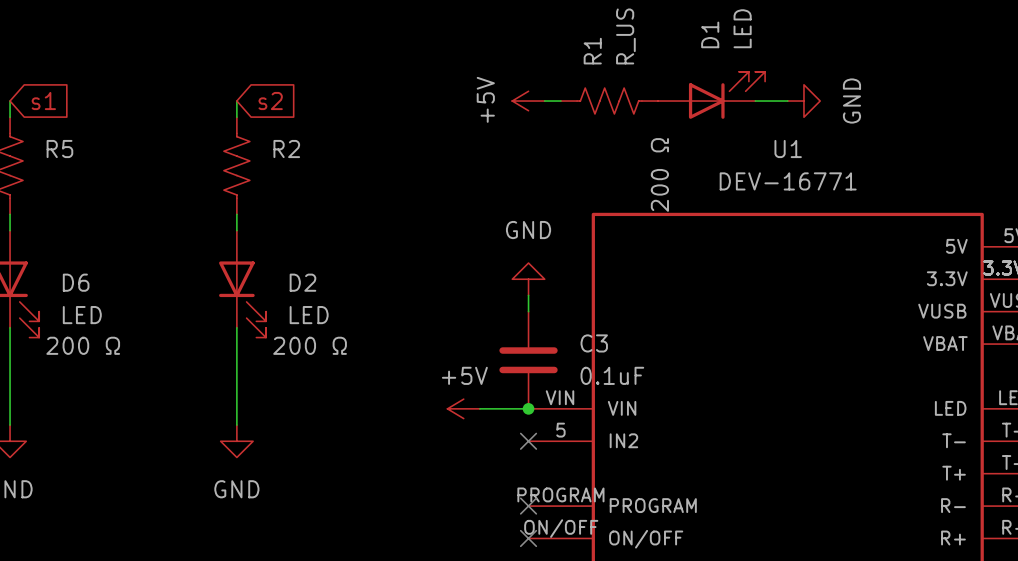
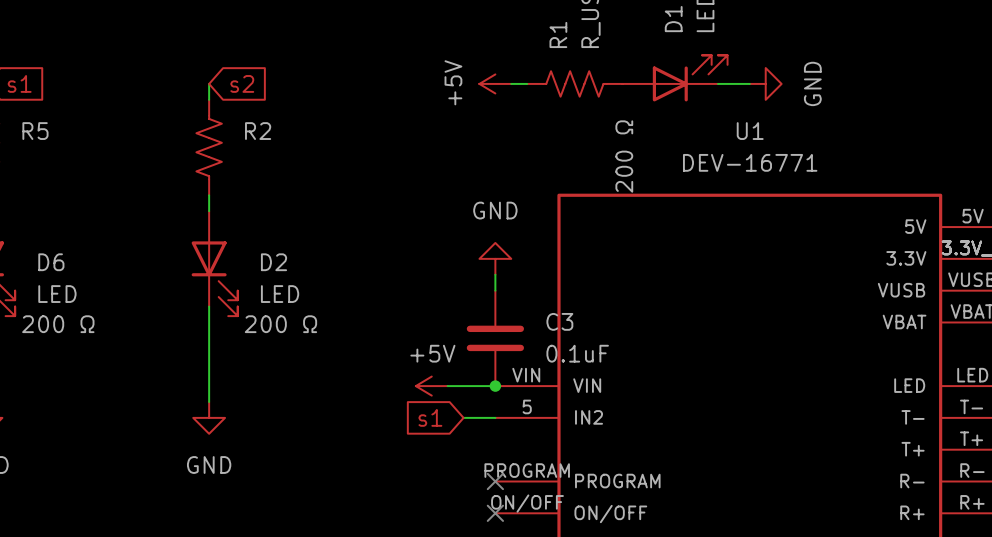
global label: none -> s1 (430, 417)
wire: none -> (463, 417) (495, 417)
no-connect mark: (528, 441) -> none

